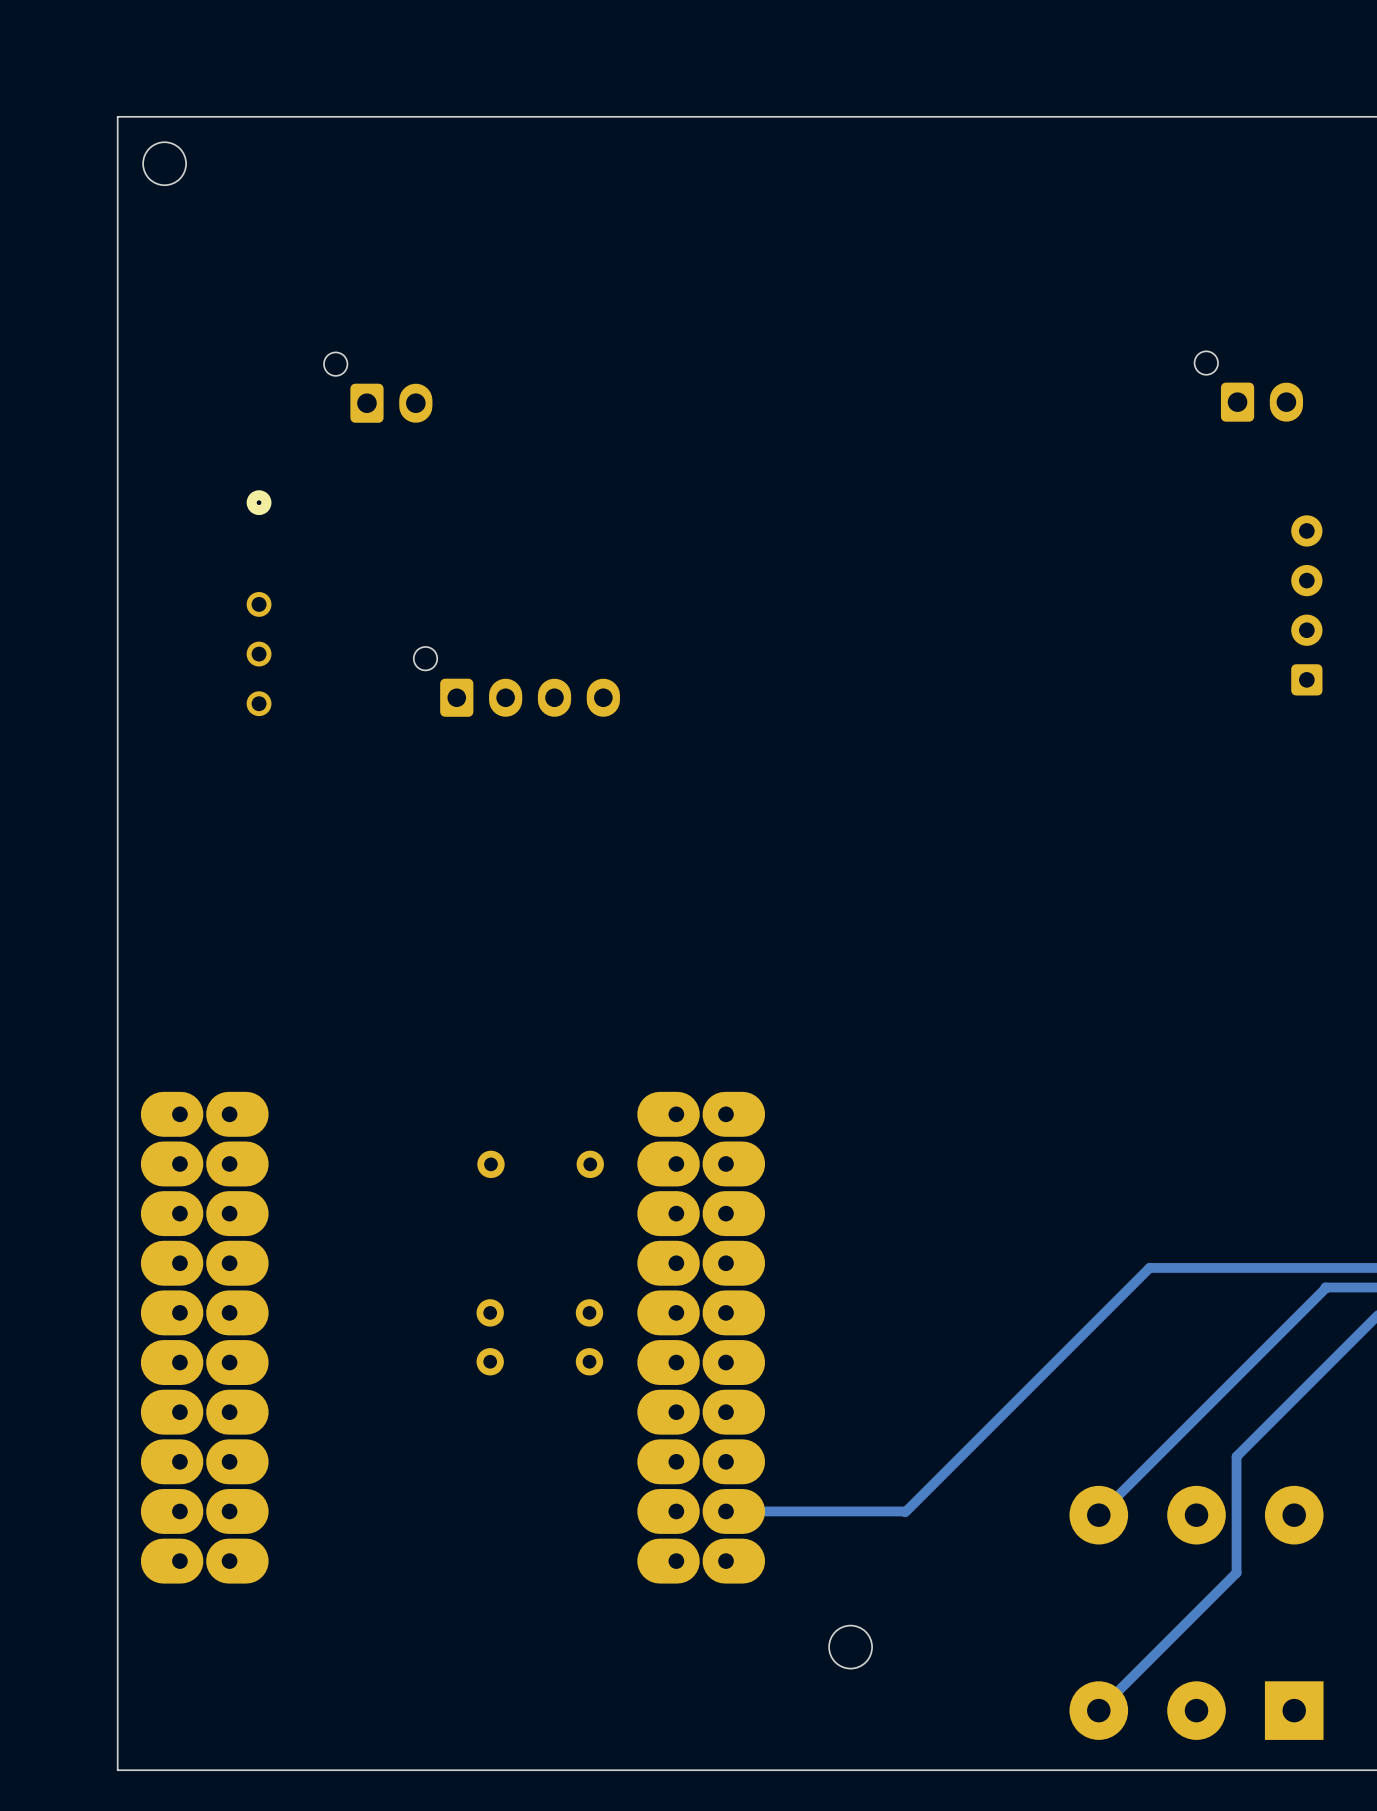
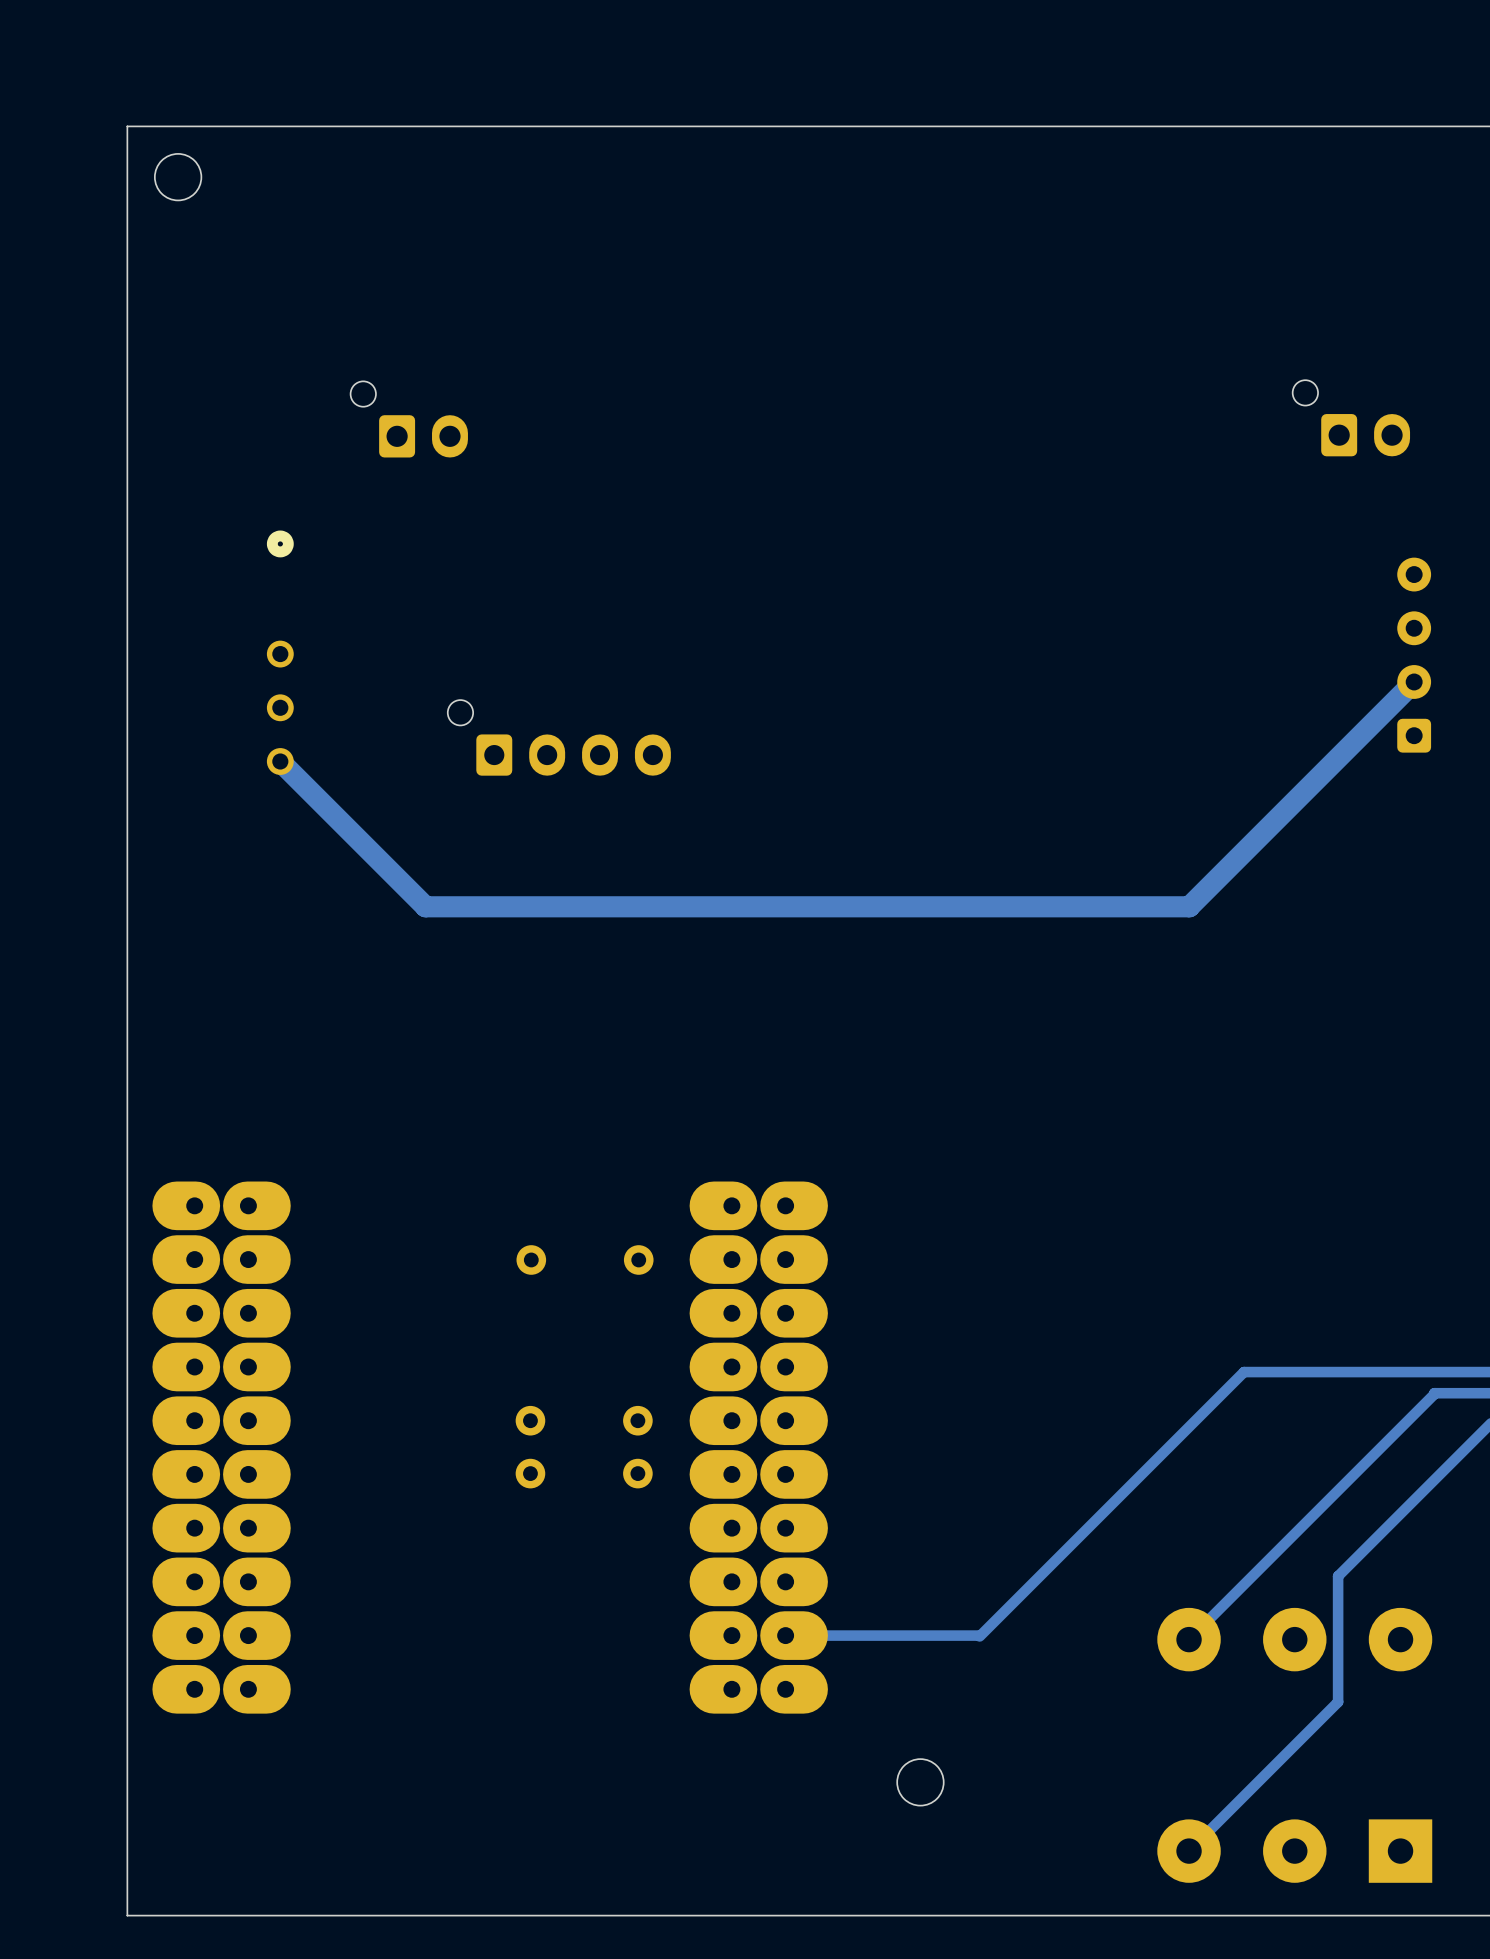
track: none -> (1414, 681) (1189, 906) (425, 906) (280, 761)

